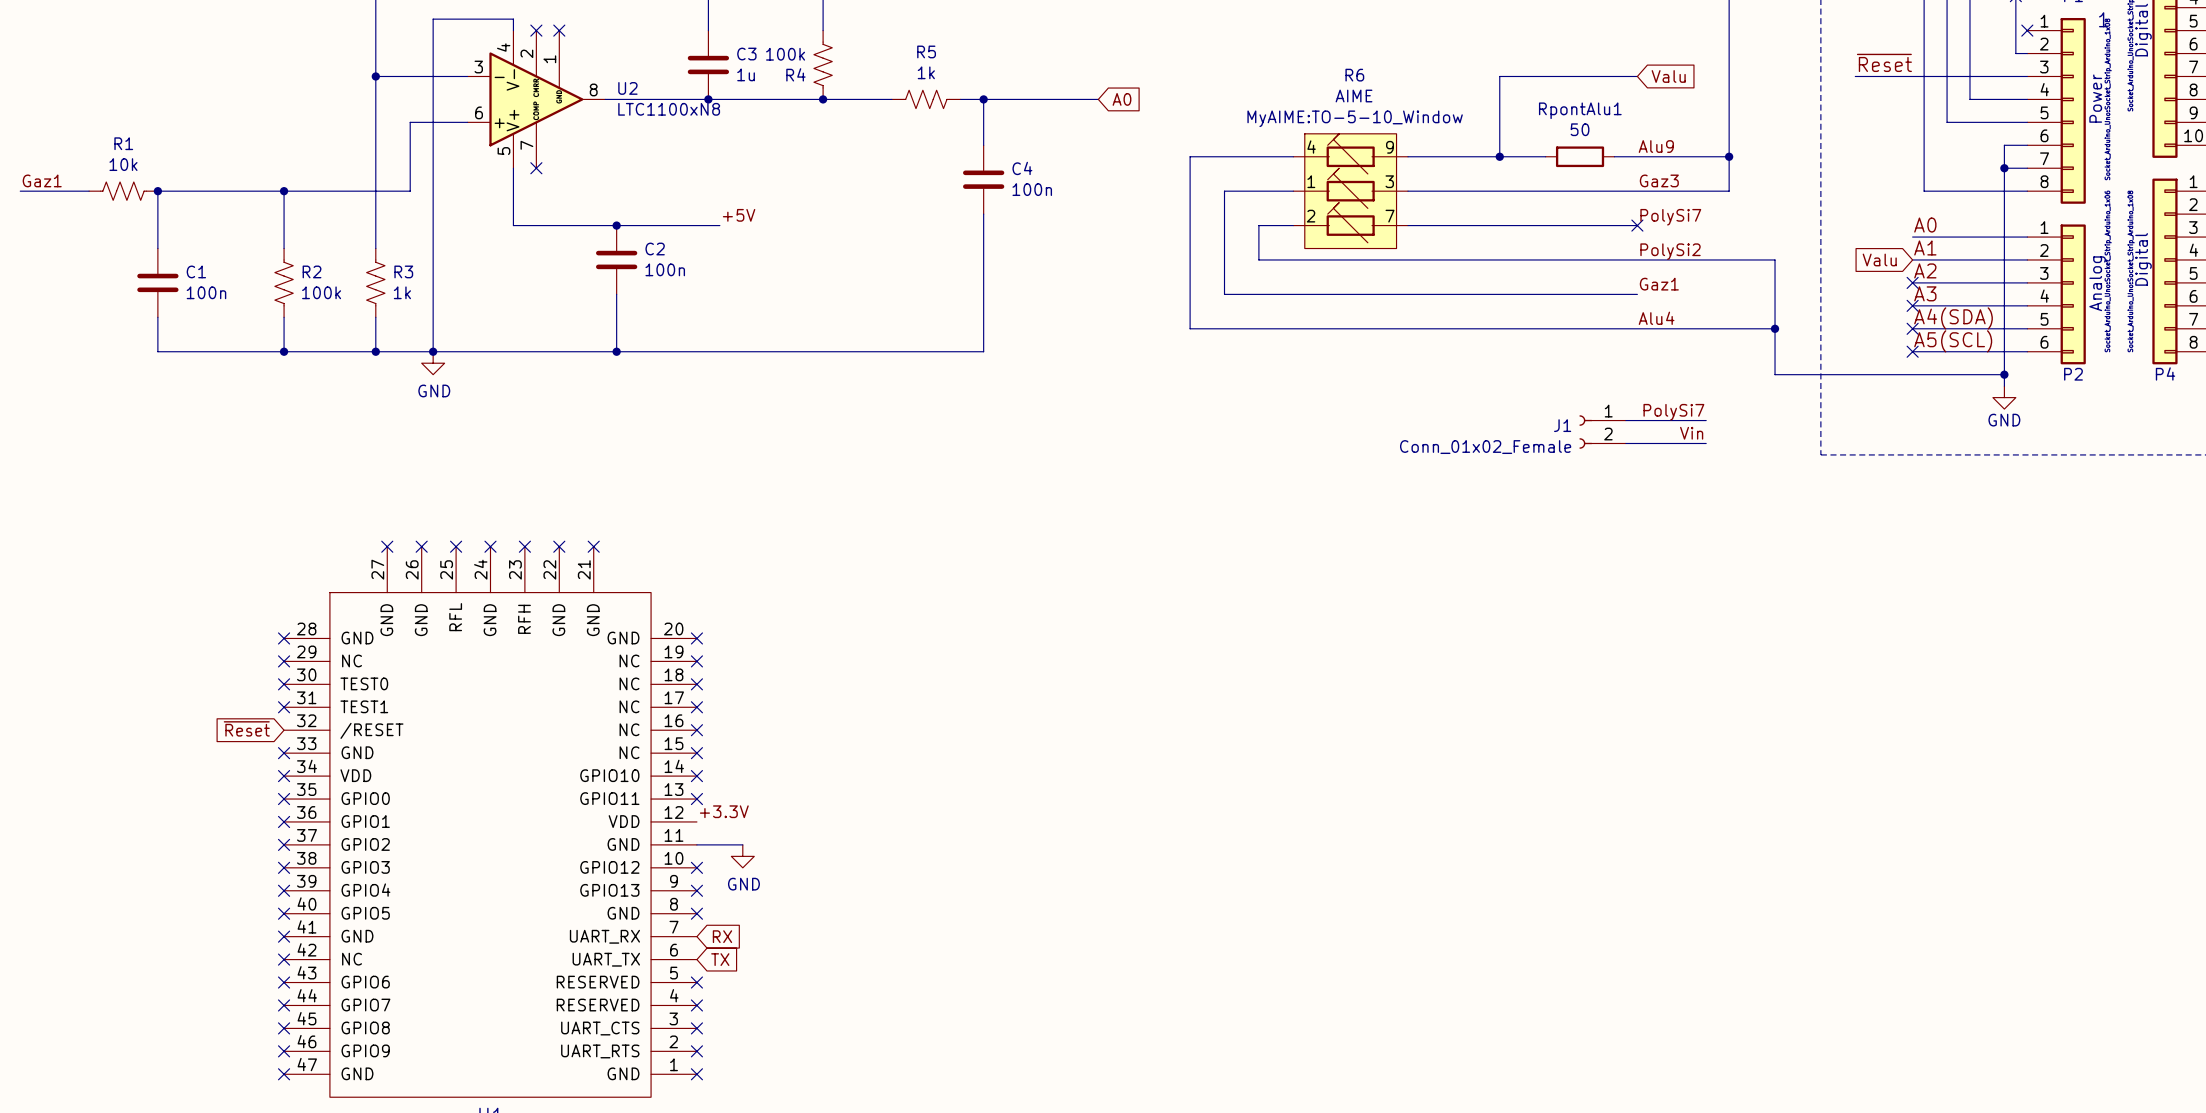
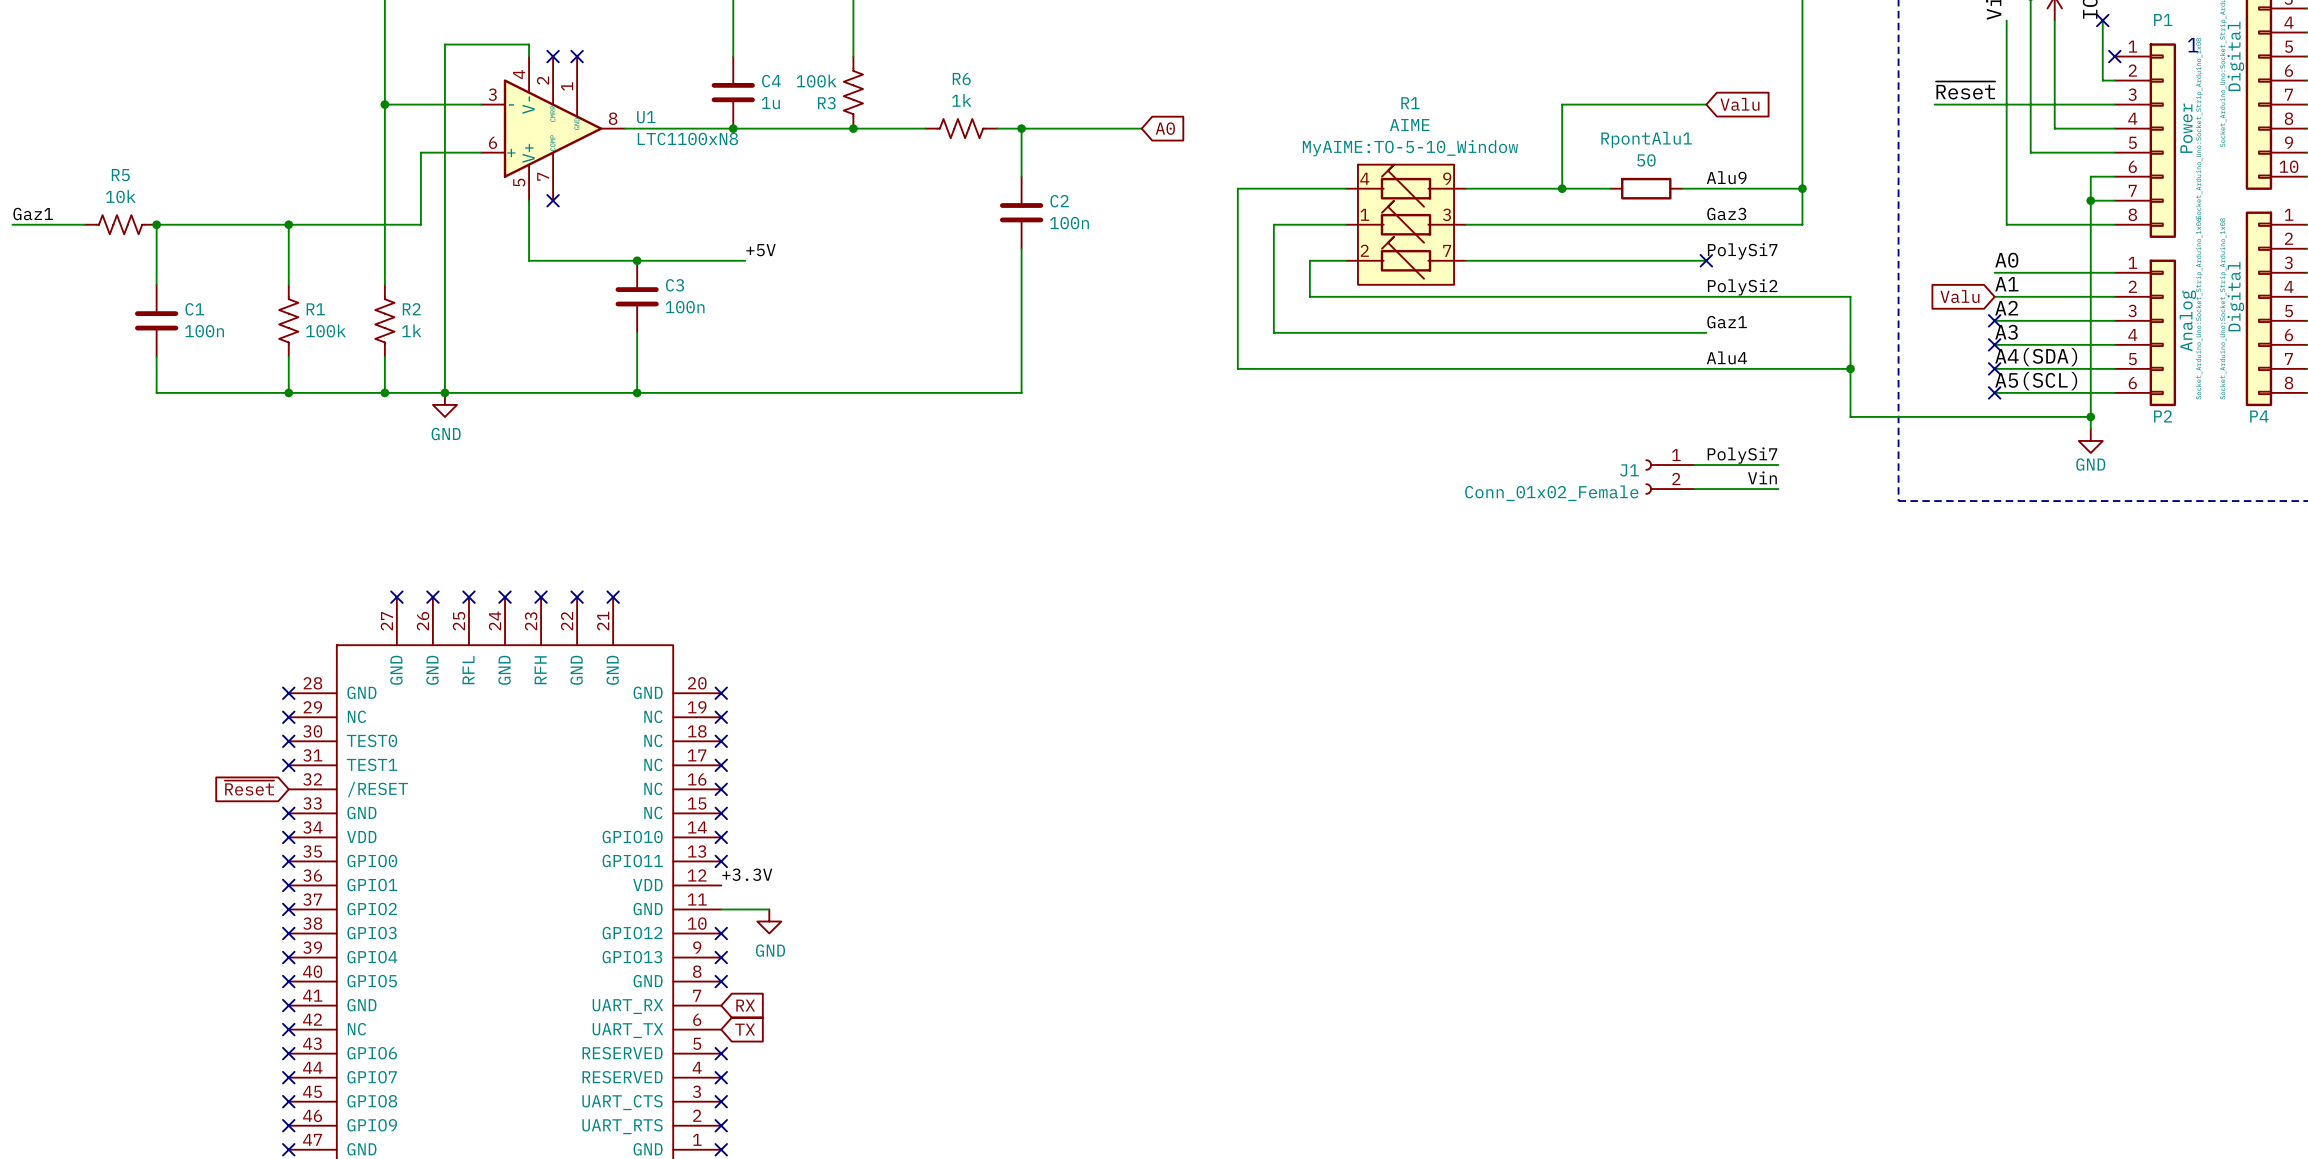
R5 name: R5 (926, 51) -> R6 (961, 79)
C3 name: C3 (746, 54) -> C4 (771, 81)
R4 name: R4 (795, 74) -> R3 (826, 103)
R6 name: R6 (1354, 75) -> R1 (1410, 103)
U2 name: U2 (627, 88) -> U1 (646, 117)
R1 name: R1 (123, 143) -> R5 (120, 175)
C4 name: C4 (1022, 168) -> C2 (1059, 201)
C2 name: C2 (655, 249) -> C3 (675, 285)
R2 name: R2 (312, 271) -> R1 (315, 309)
R3 name: R3 (403, 271) -> R2 (411, 309)

